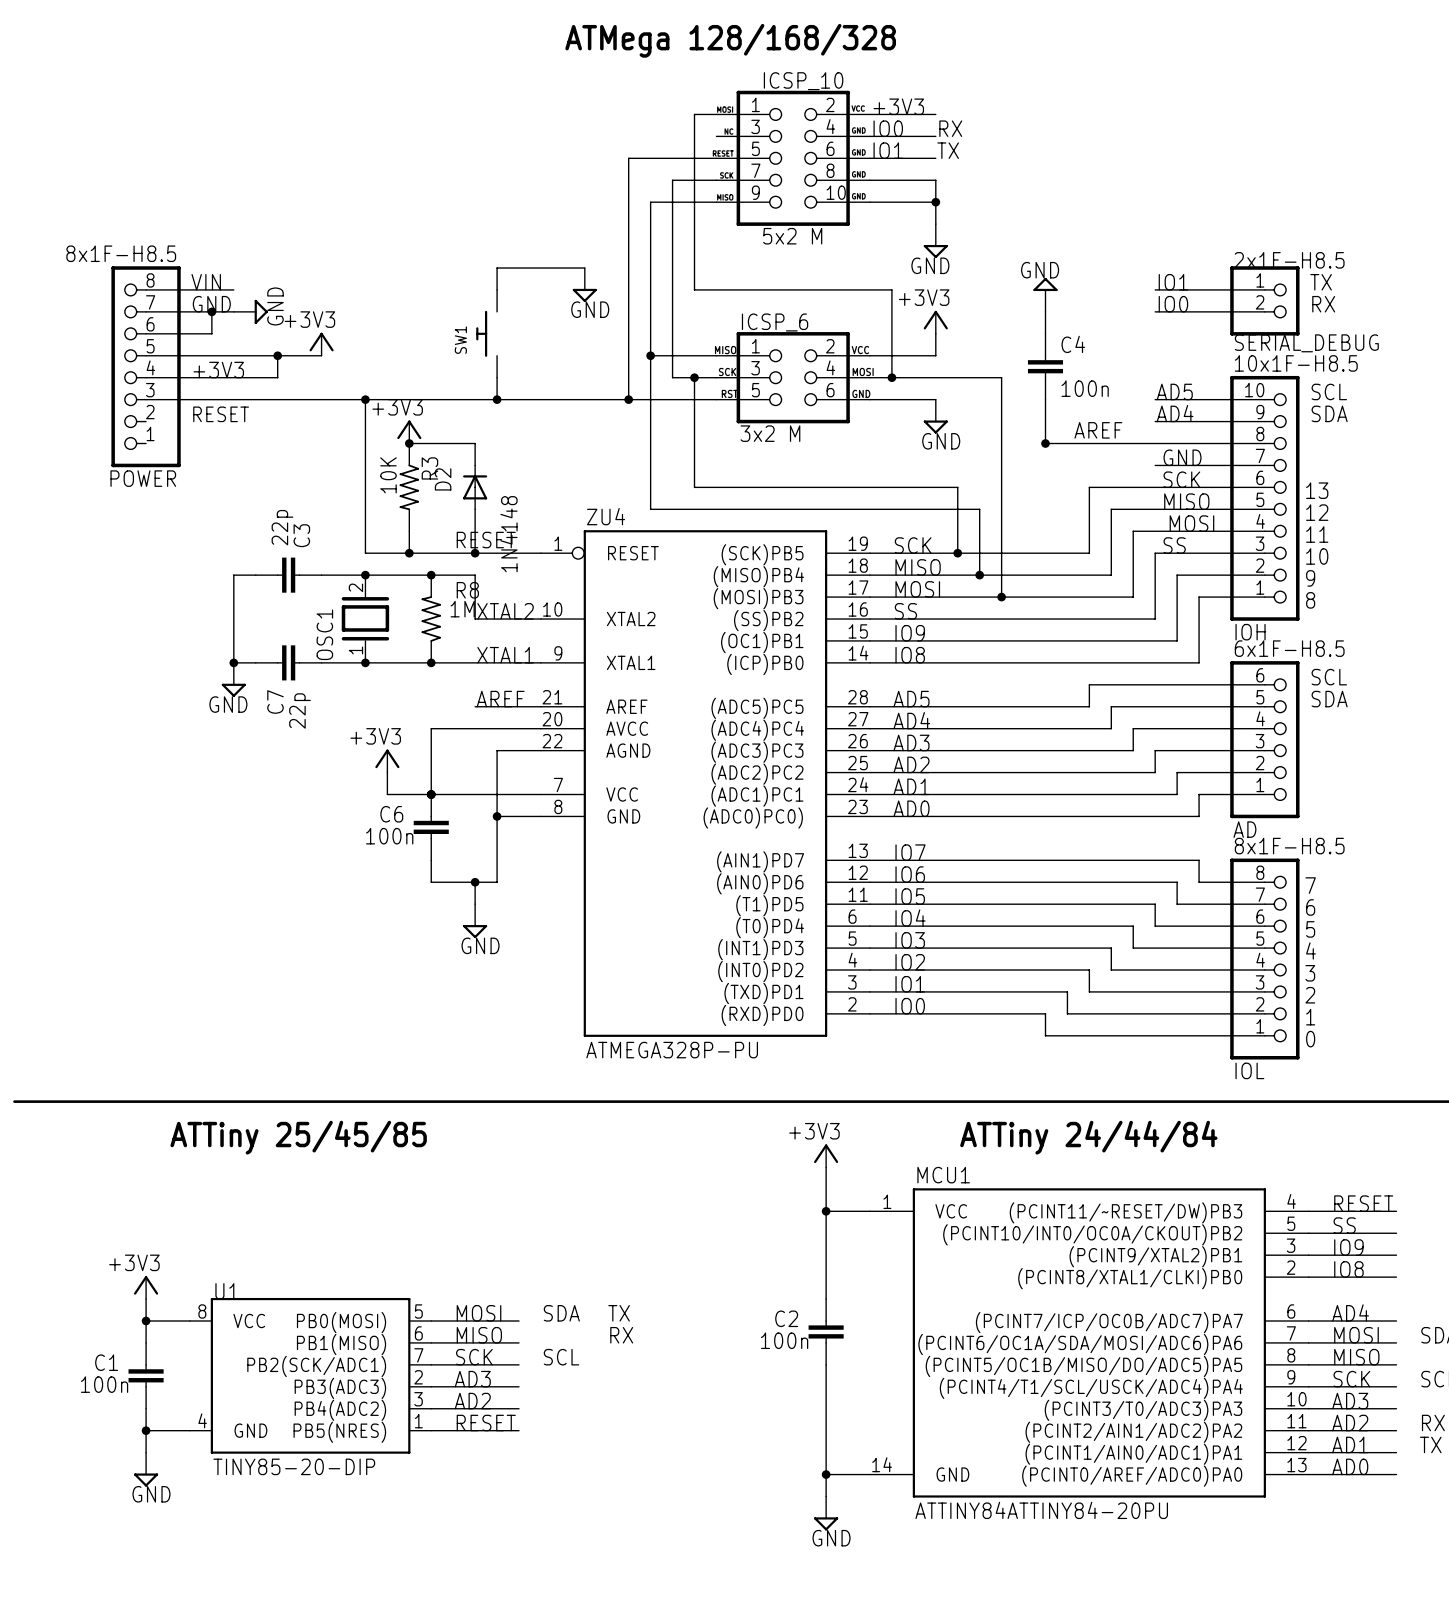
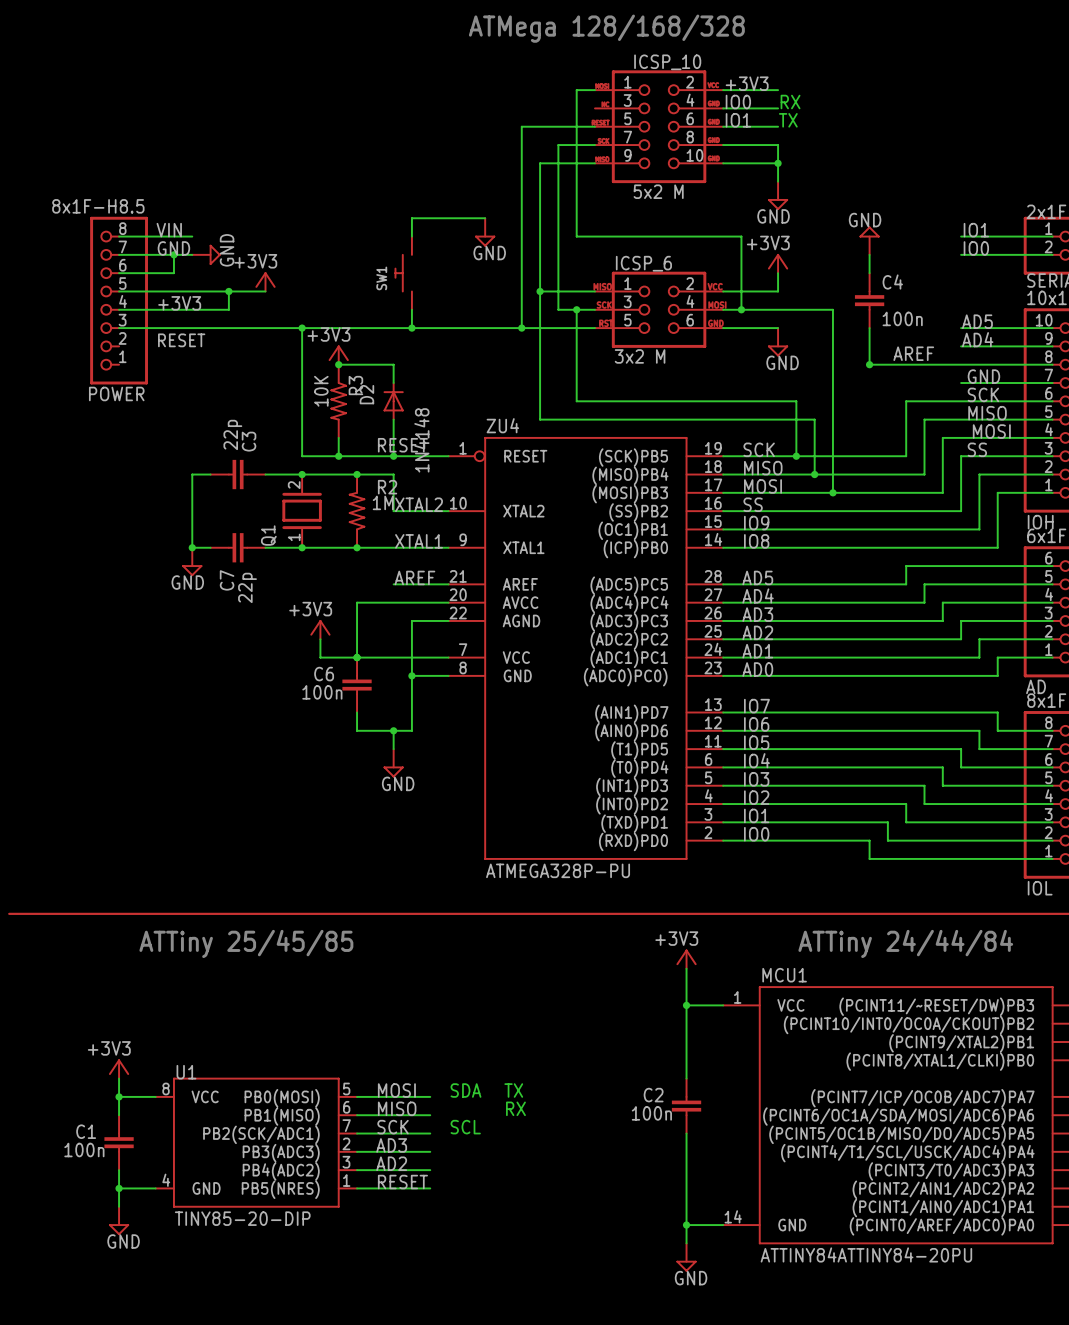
R8 name: R8 (467, 590) -> R2 (387, 487)
OSC1 name: OSC1 (324, 634) -> Q1 (268, 535)

